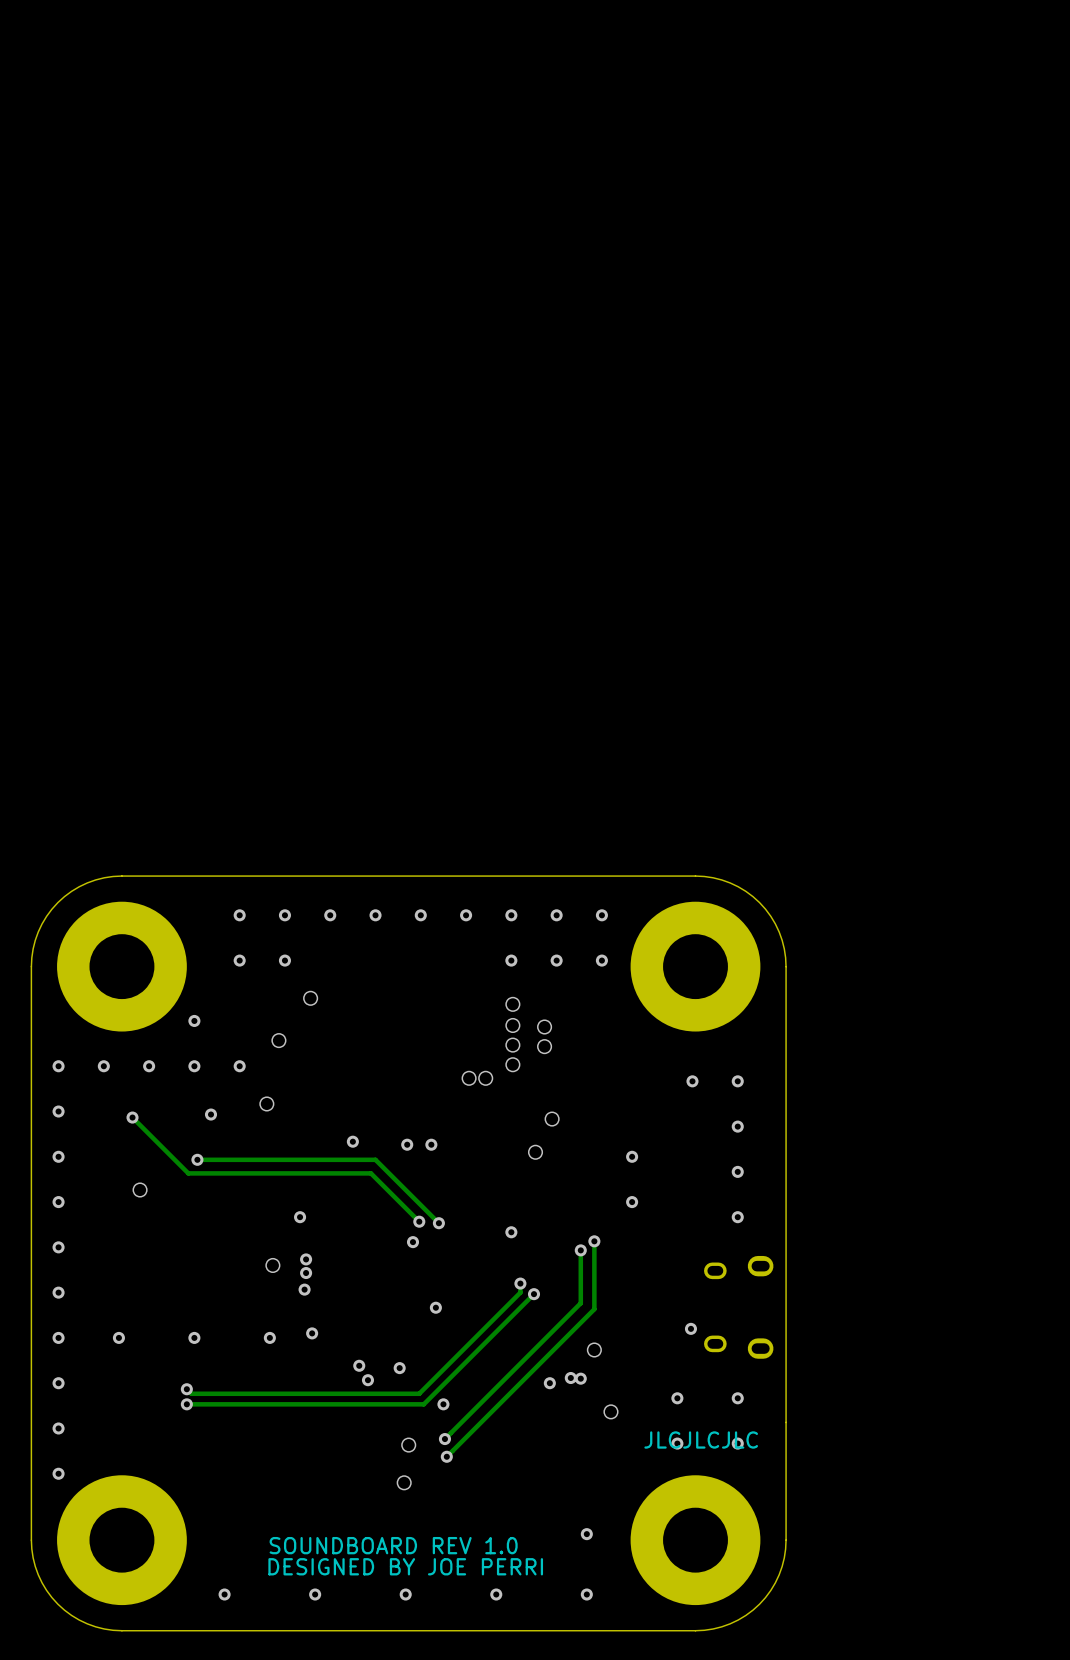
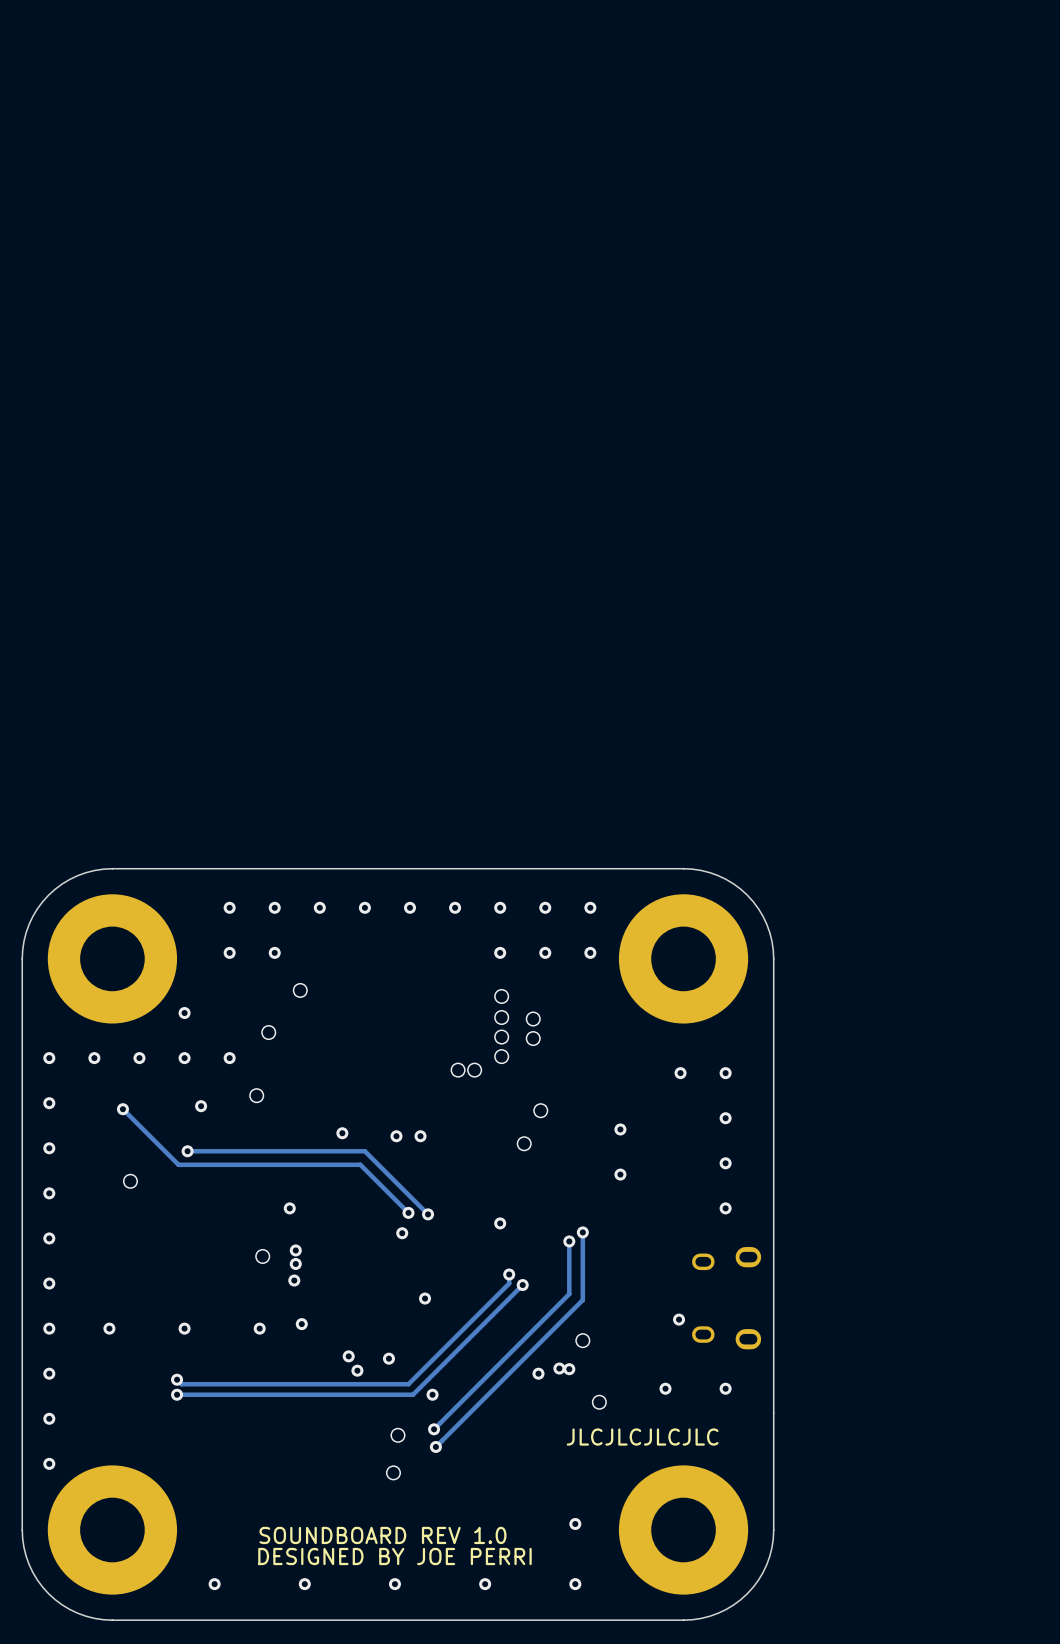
via: none -> (620, 1129)
via: (632, 1156) -> none
via: none -> (620, 1174)
via: (632, 1202) -> none
text: JLCJLCJLC (701, 1439) -> JLCJLCJLCJLC (642, 1437)
via: (677, 1443) -> none
via: (737, 1443) -> none

